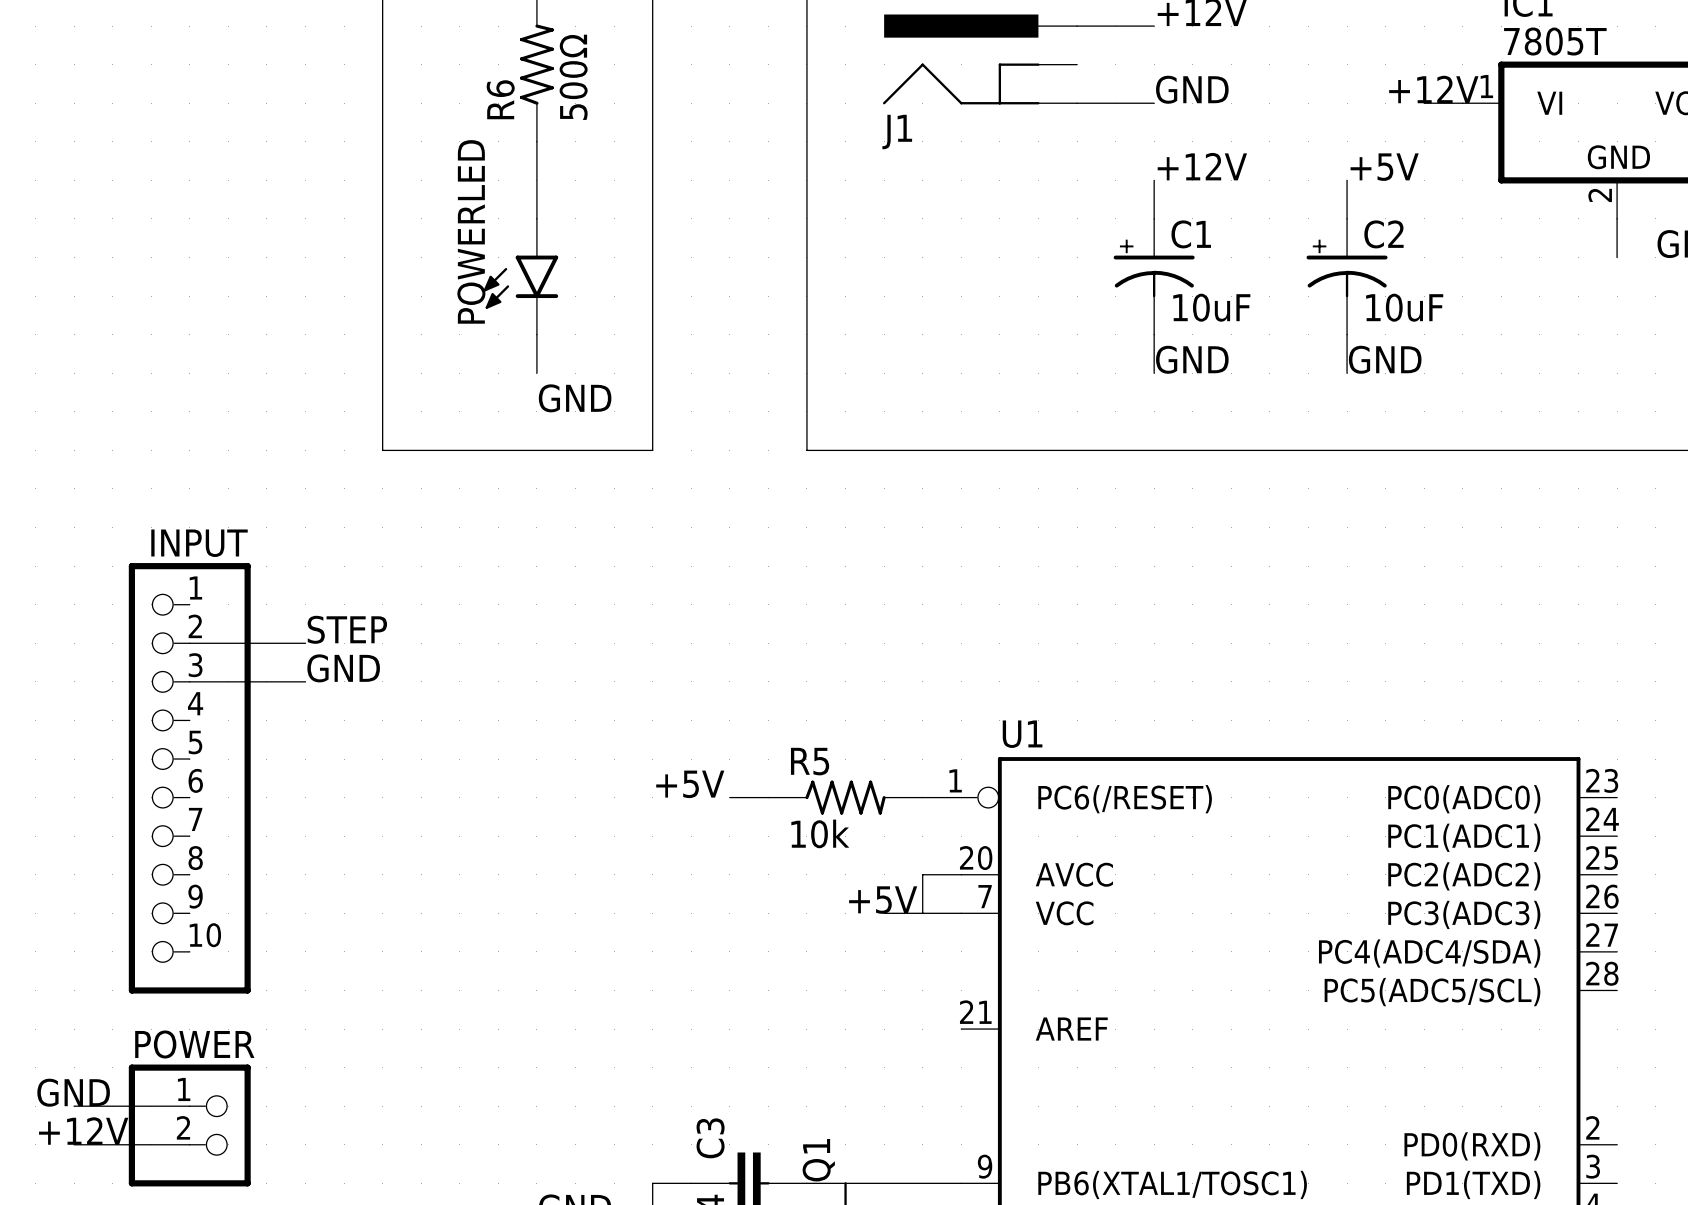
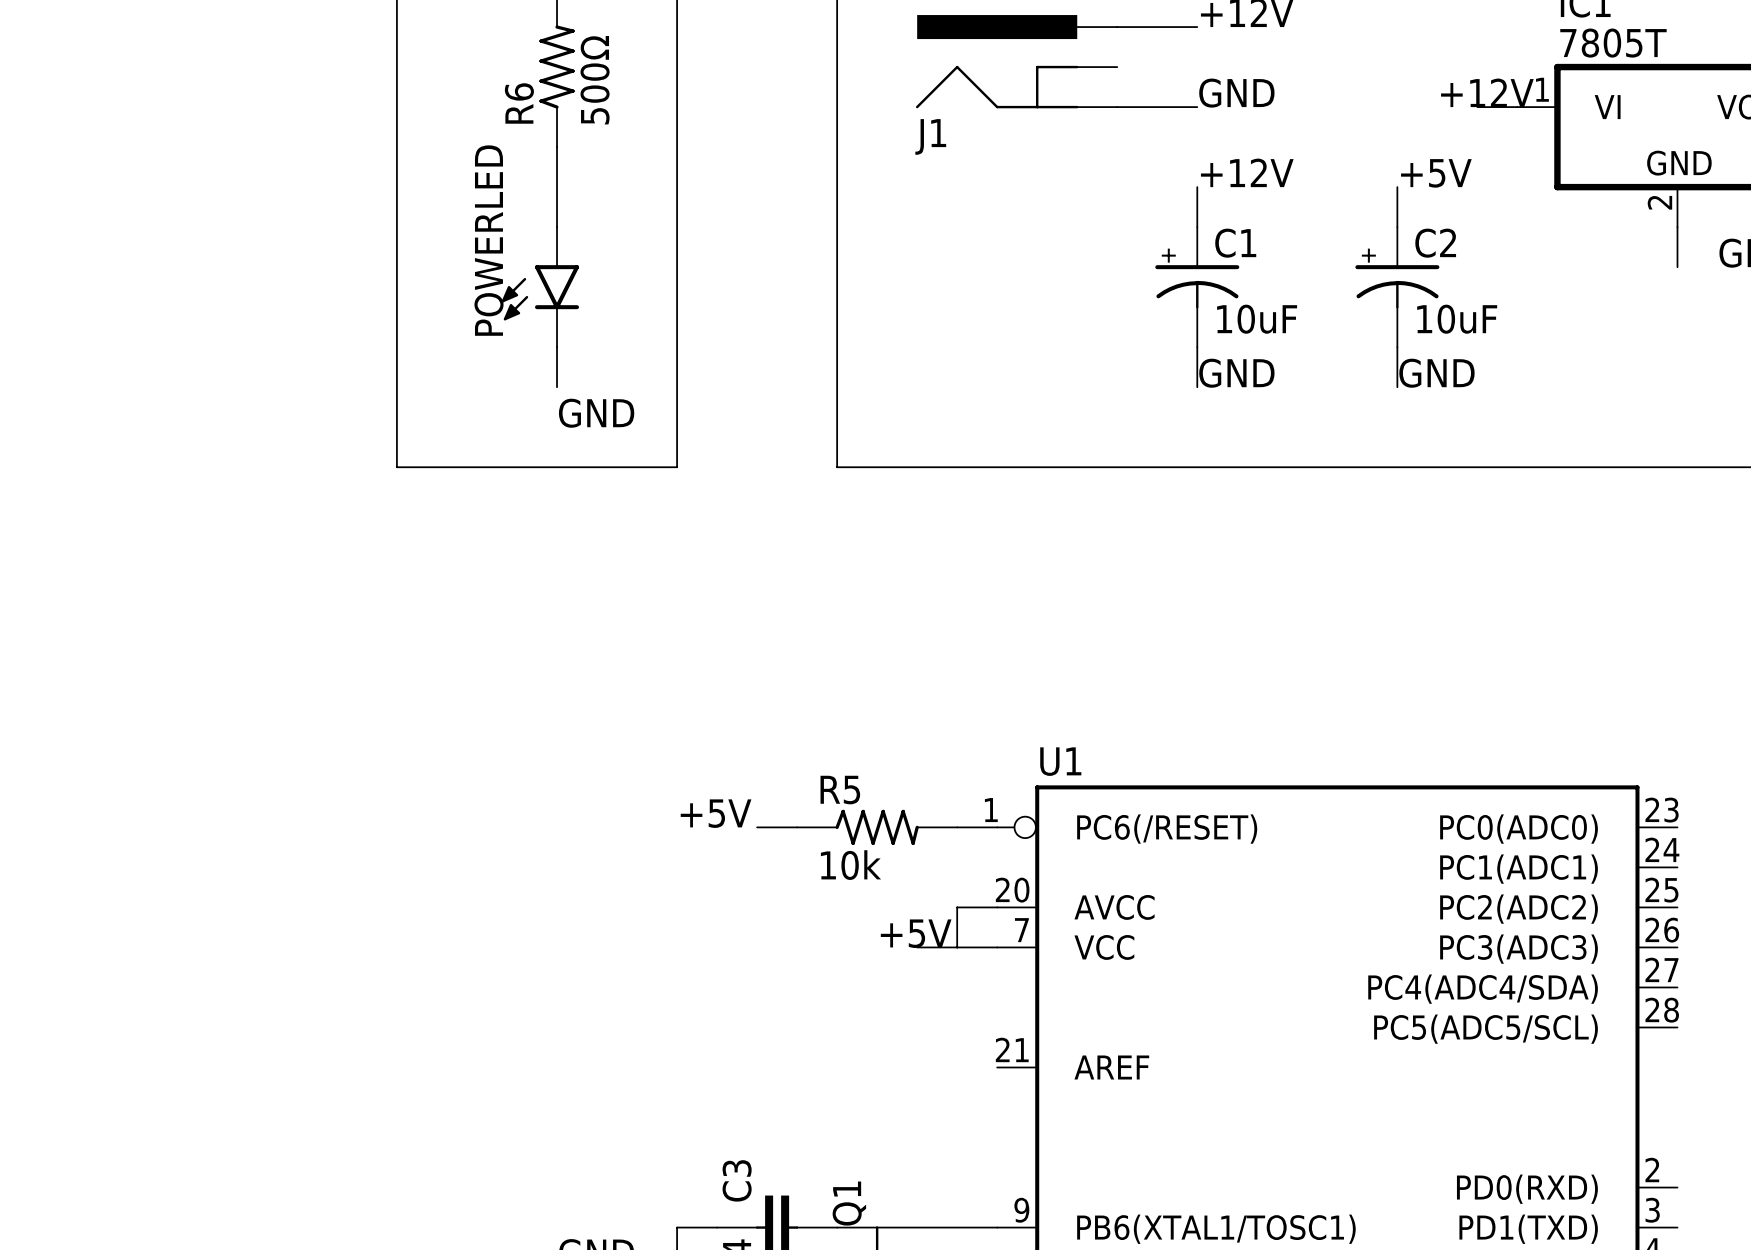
label: STEP (347, 629) -> none
wire: (189, 643) (305, 643) -> none
label: GND (343, 668) -> none
wire: (189, 681) (305, 681) -> none
INPUT: (189, 778) -> none
label: GND (73, 1092) -> none
wire: (74, 1106) (189, 1106) -> none
POWER: (189, 1125) -> none
label: +12V (83, 1131) -> none
wire: (74, 1144) (189, 1144) -> none

